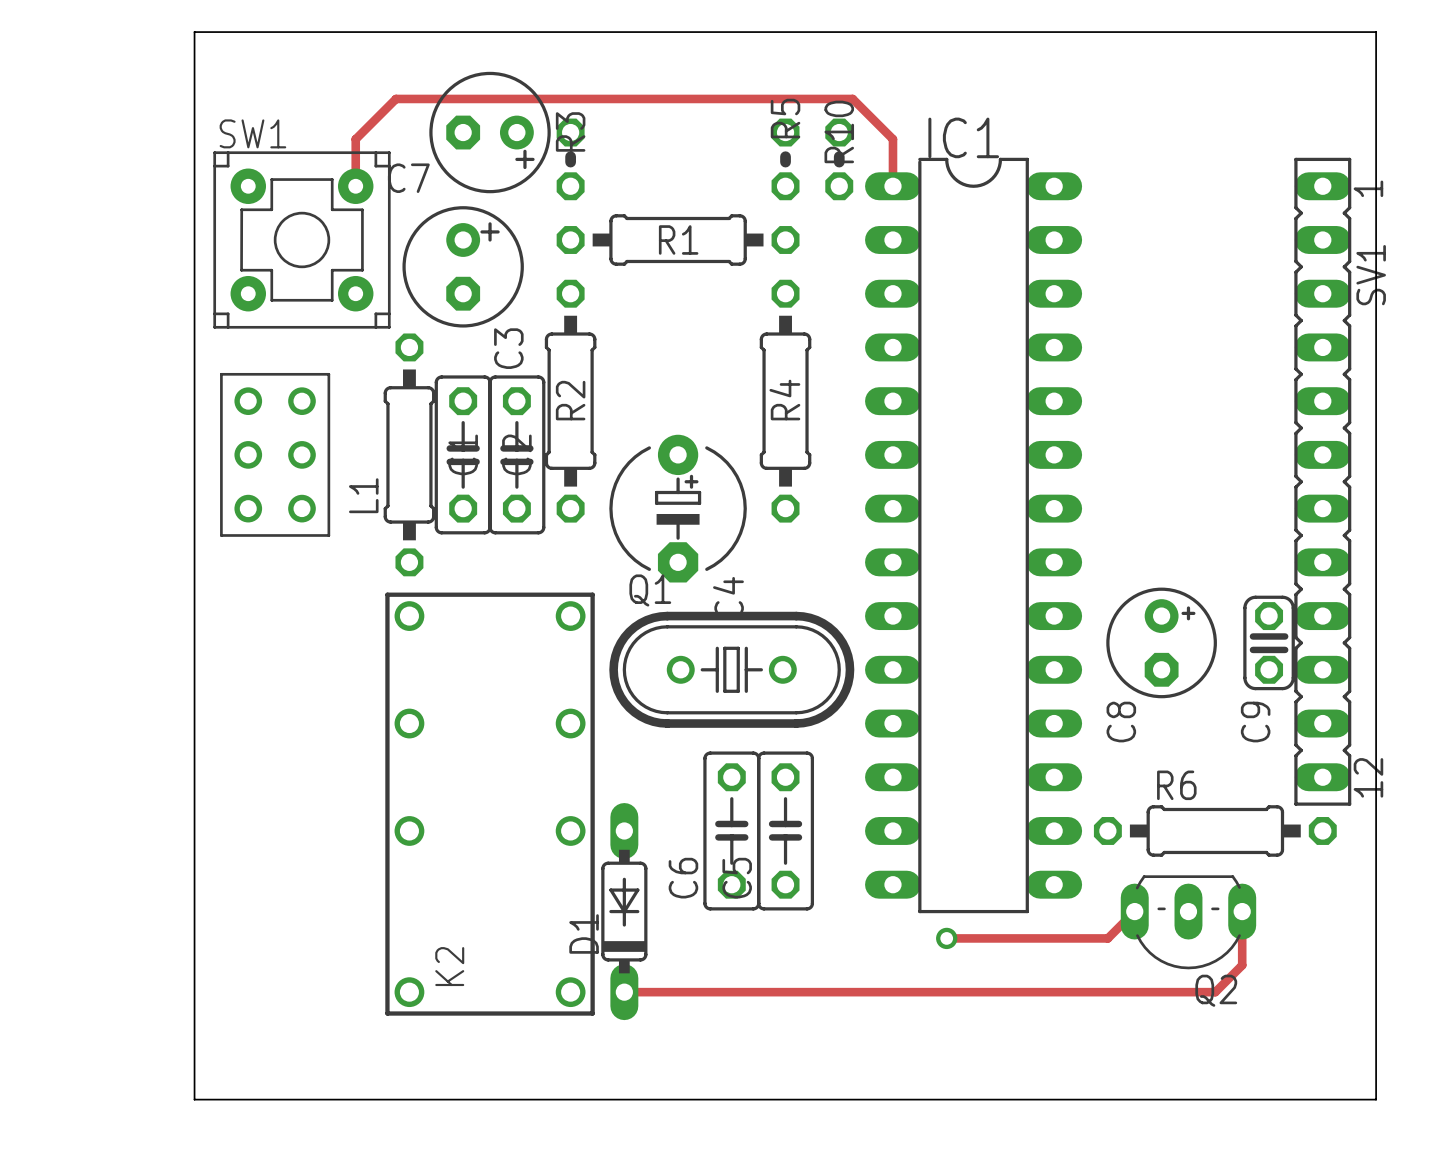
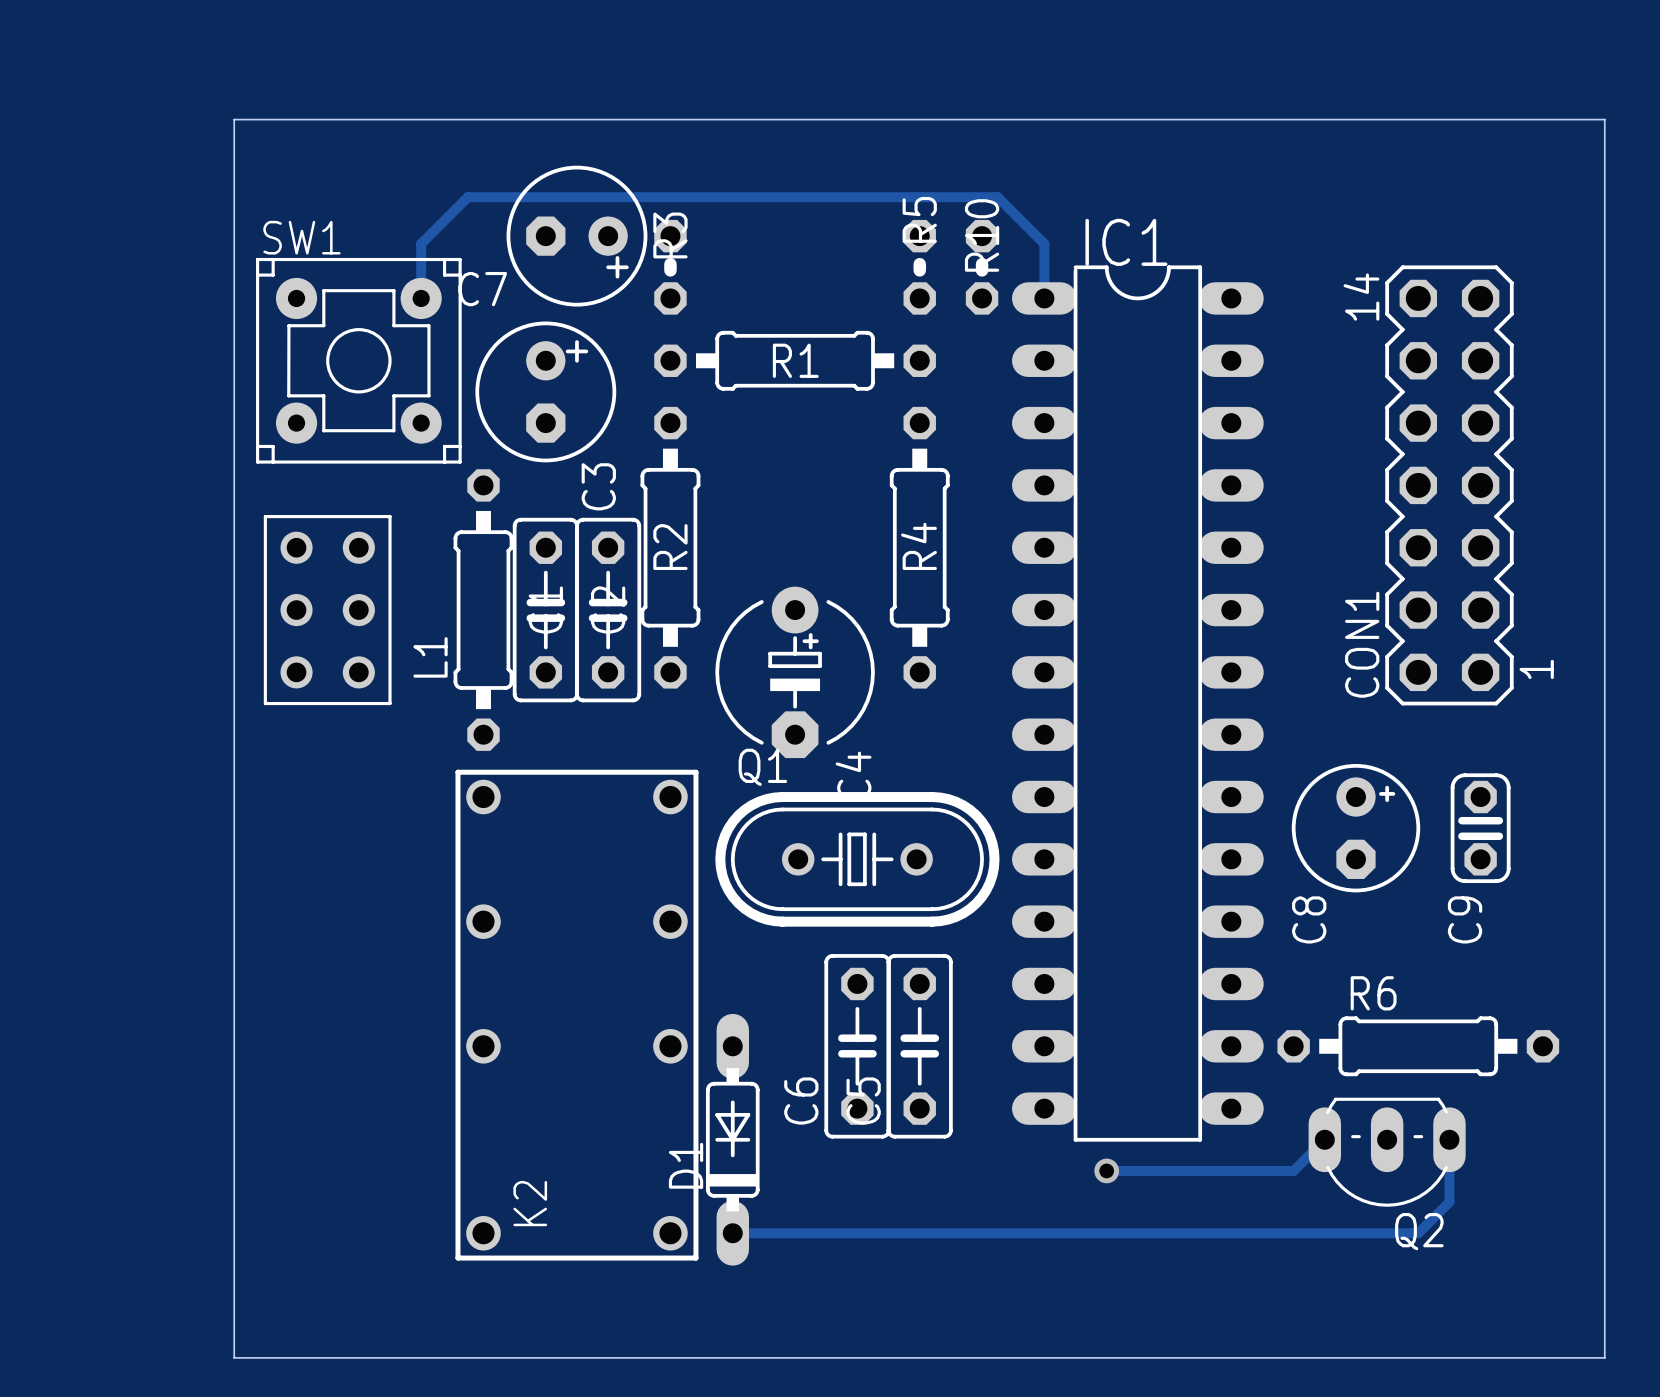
CON1: none -> (1449, 485)
SV1: (1322, 481) -> none

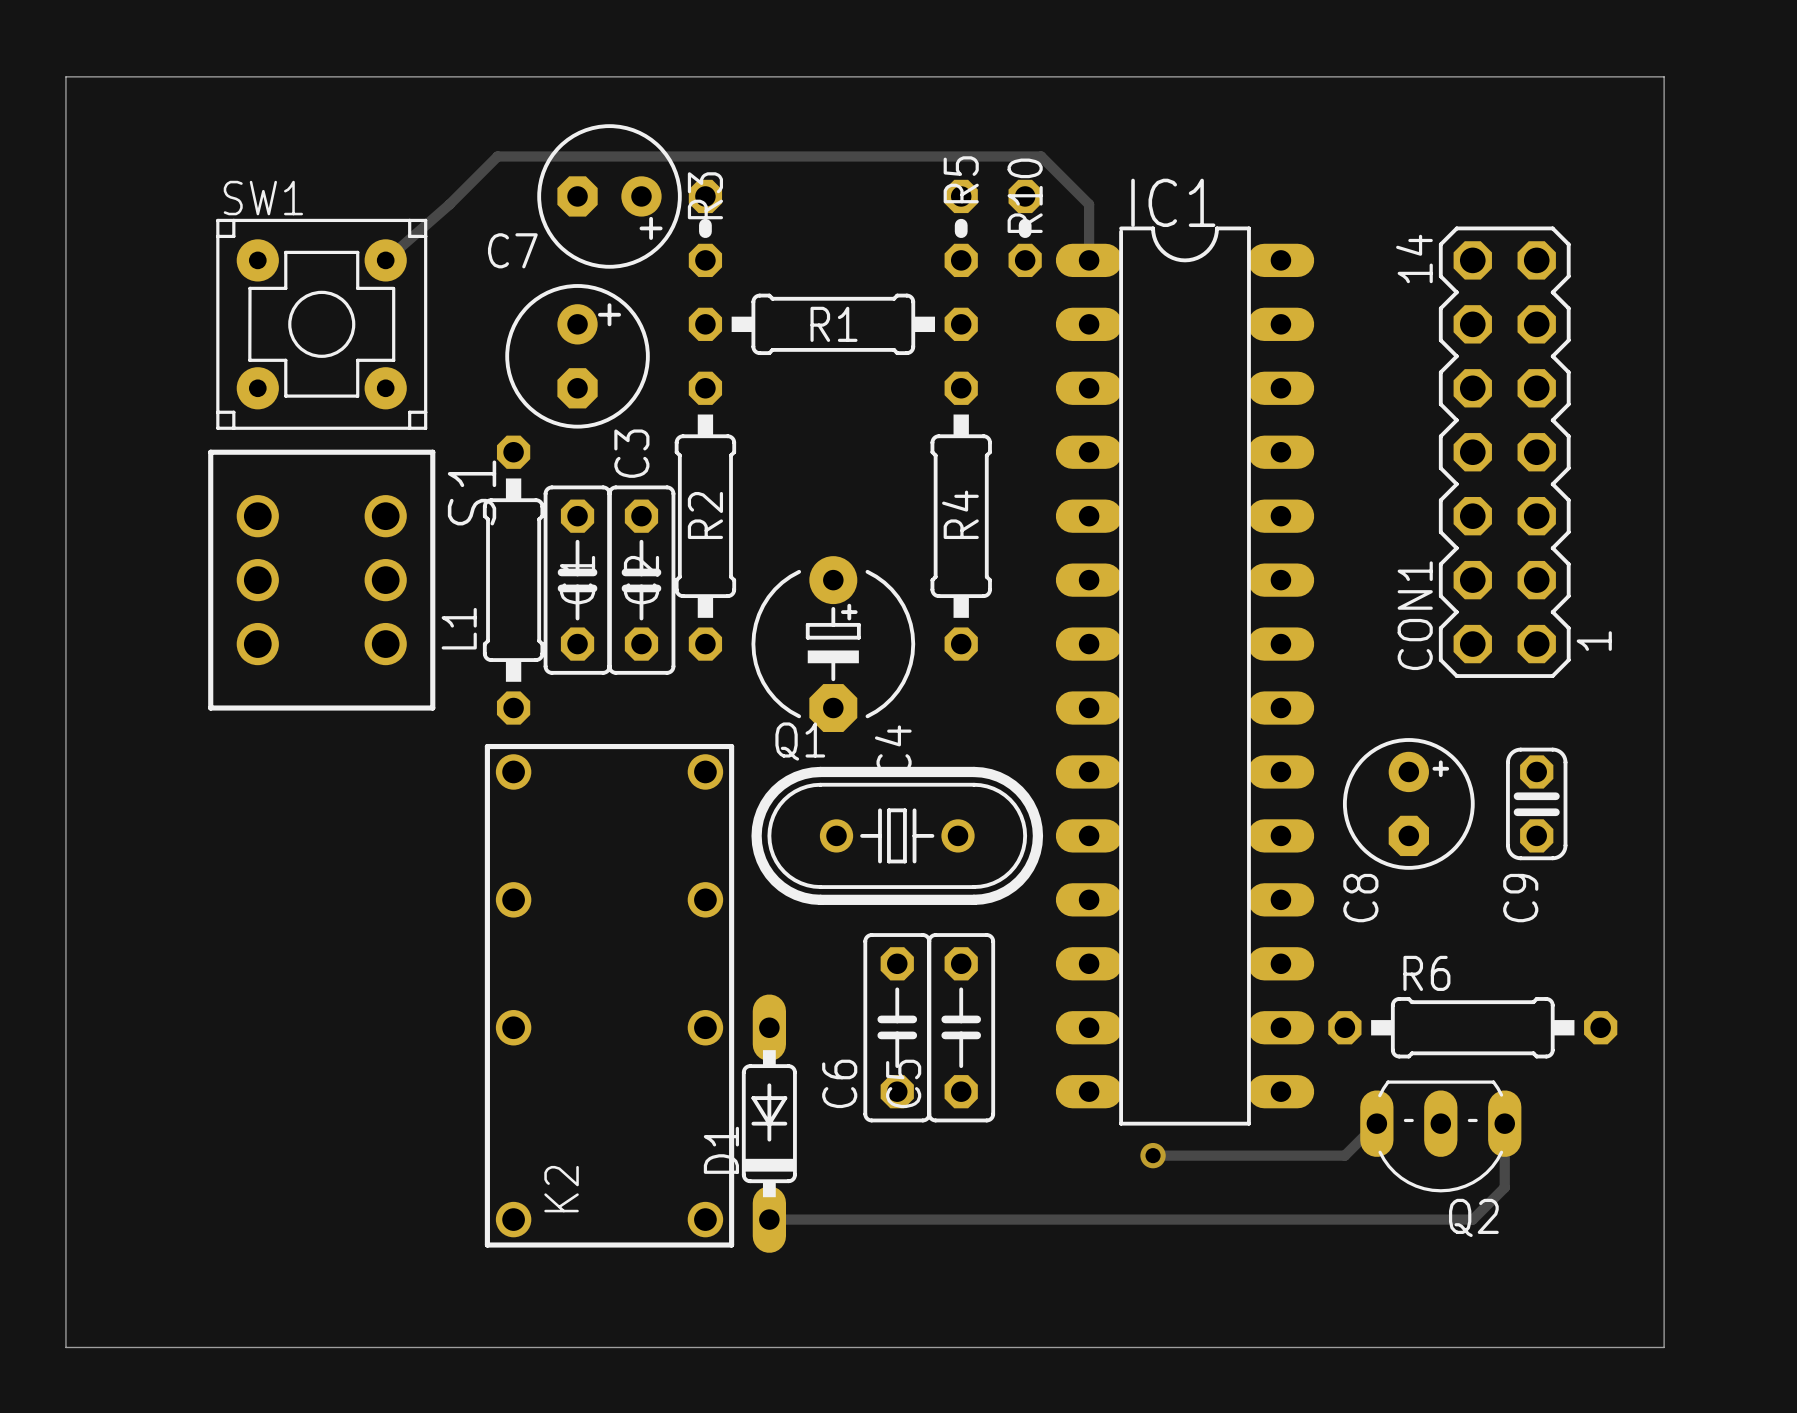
board edge: (234, 119) (234, 1357) -> (257, 76) (65, 76) (65, 1347) (257, 1347)
track: (421, 243) (421, 298) -> (449, 204) (385, 260)
SW1 position: (358, 360) -> (321, 324)
S1: none -> (321, 580)
part: (327, 610) -> none

